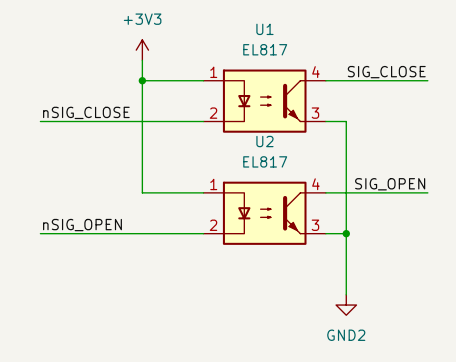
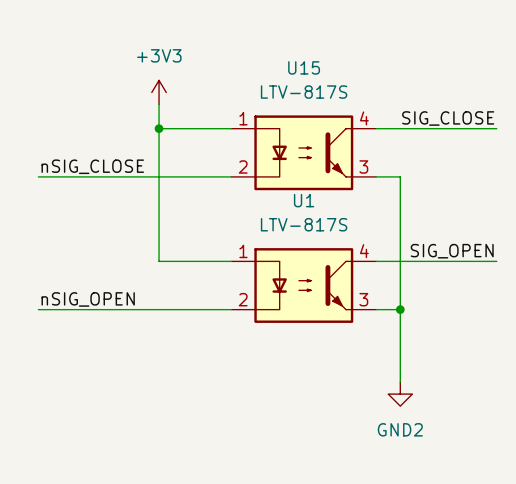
U1 value: EL817 (265, 49) -> LTV-817S (304, 224)
U1 symbol: [203, 69, 326, 133] -> [231, 248, 377, 323]
U15: none -> LTV-817S (303, 152)
U2: EL817 (264, 213) -> none

